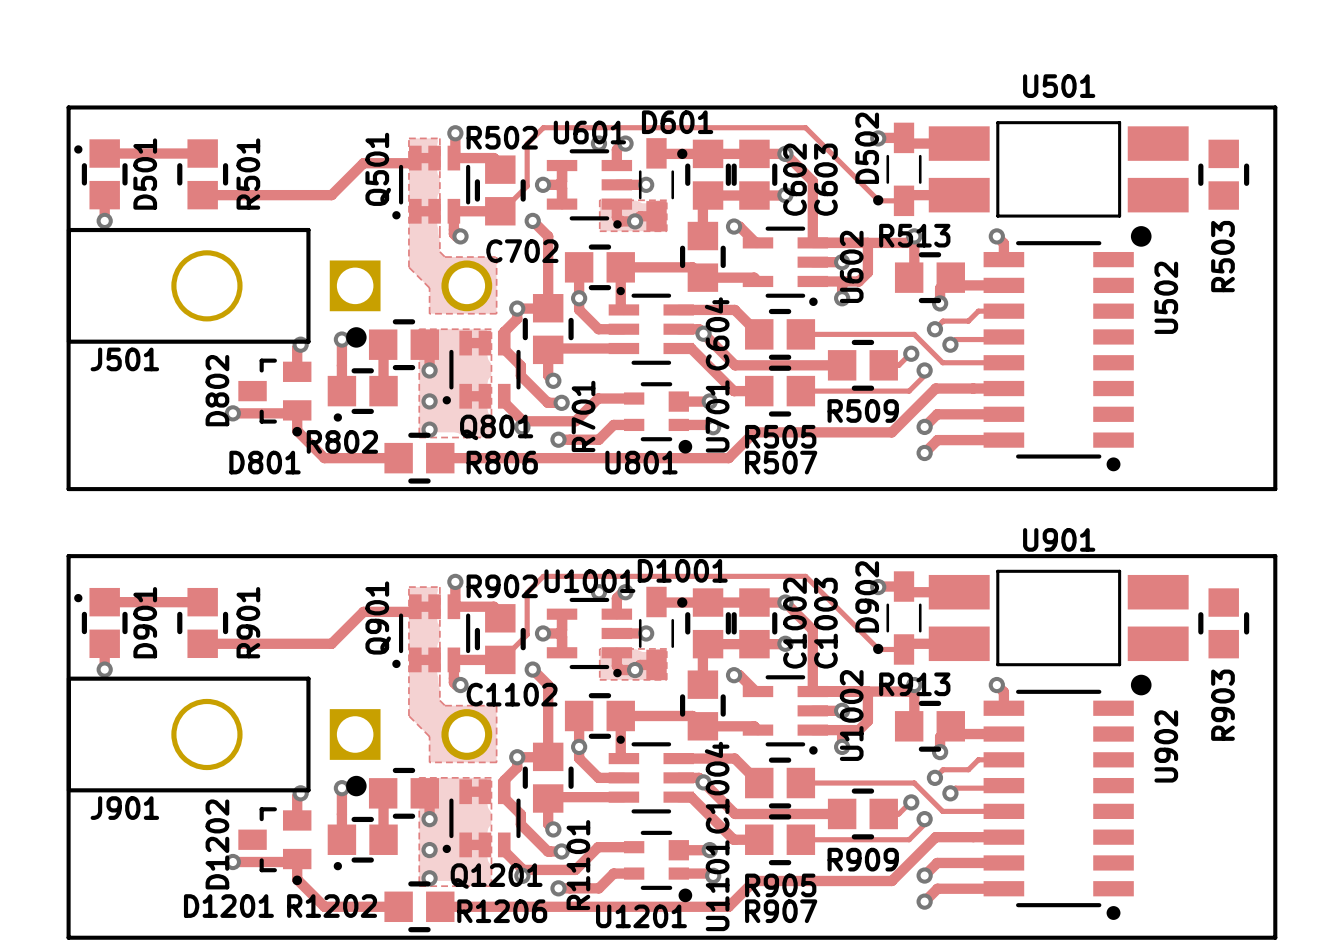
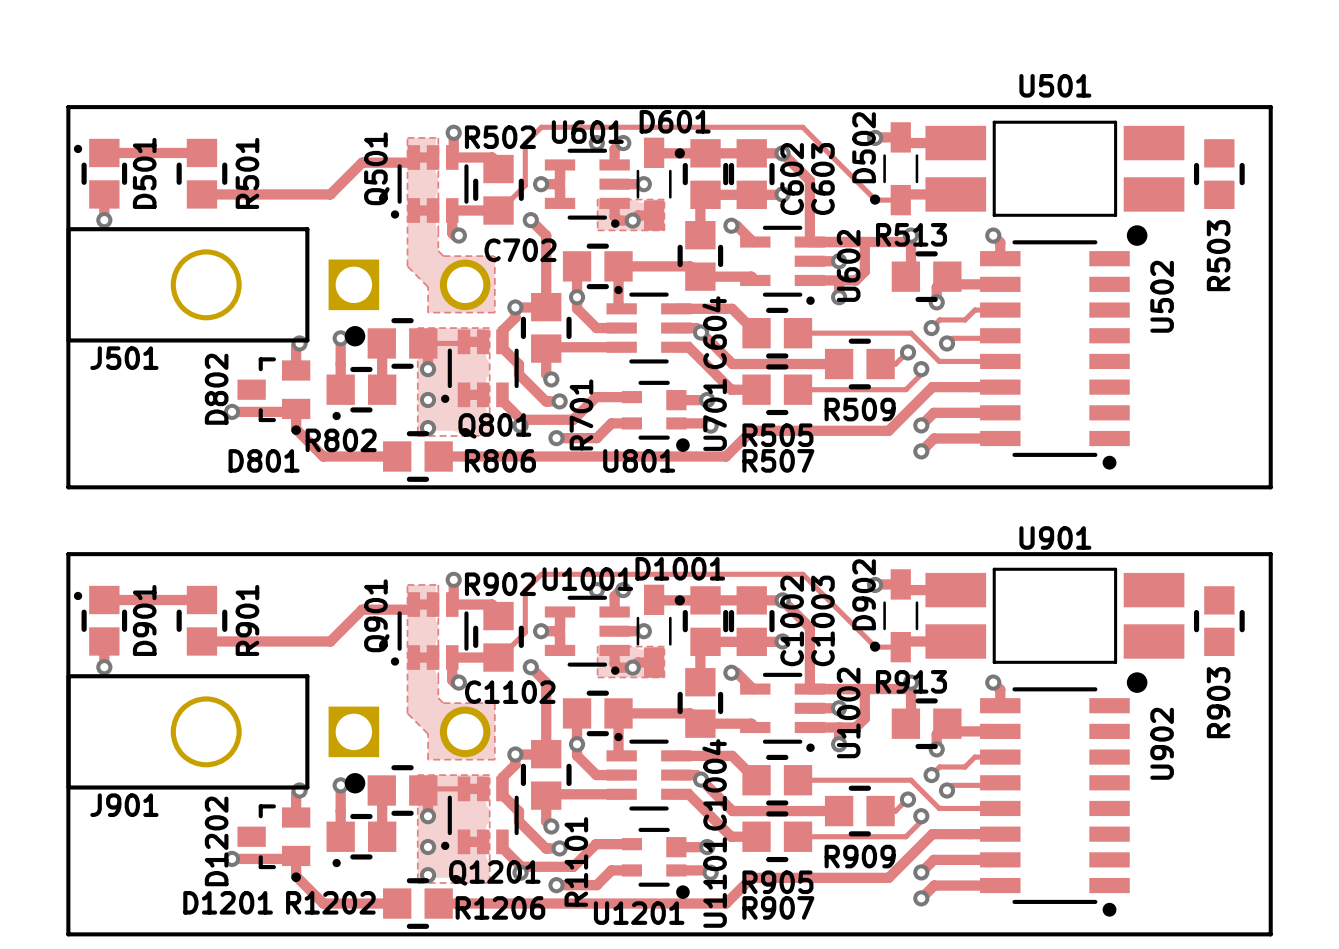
track: none -> (464, 341) (462, 343) (423, 343)
track: none -> (464, 788) (424, 788) (423, 790)

